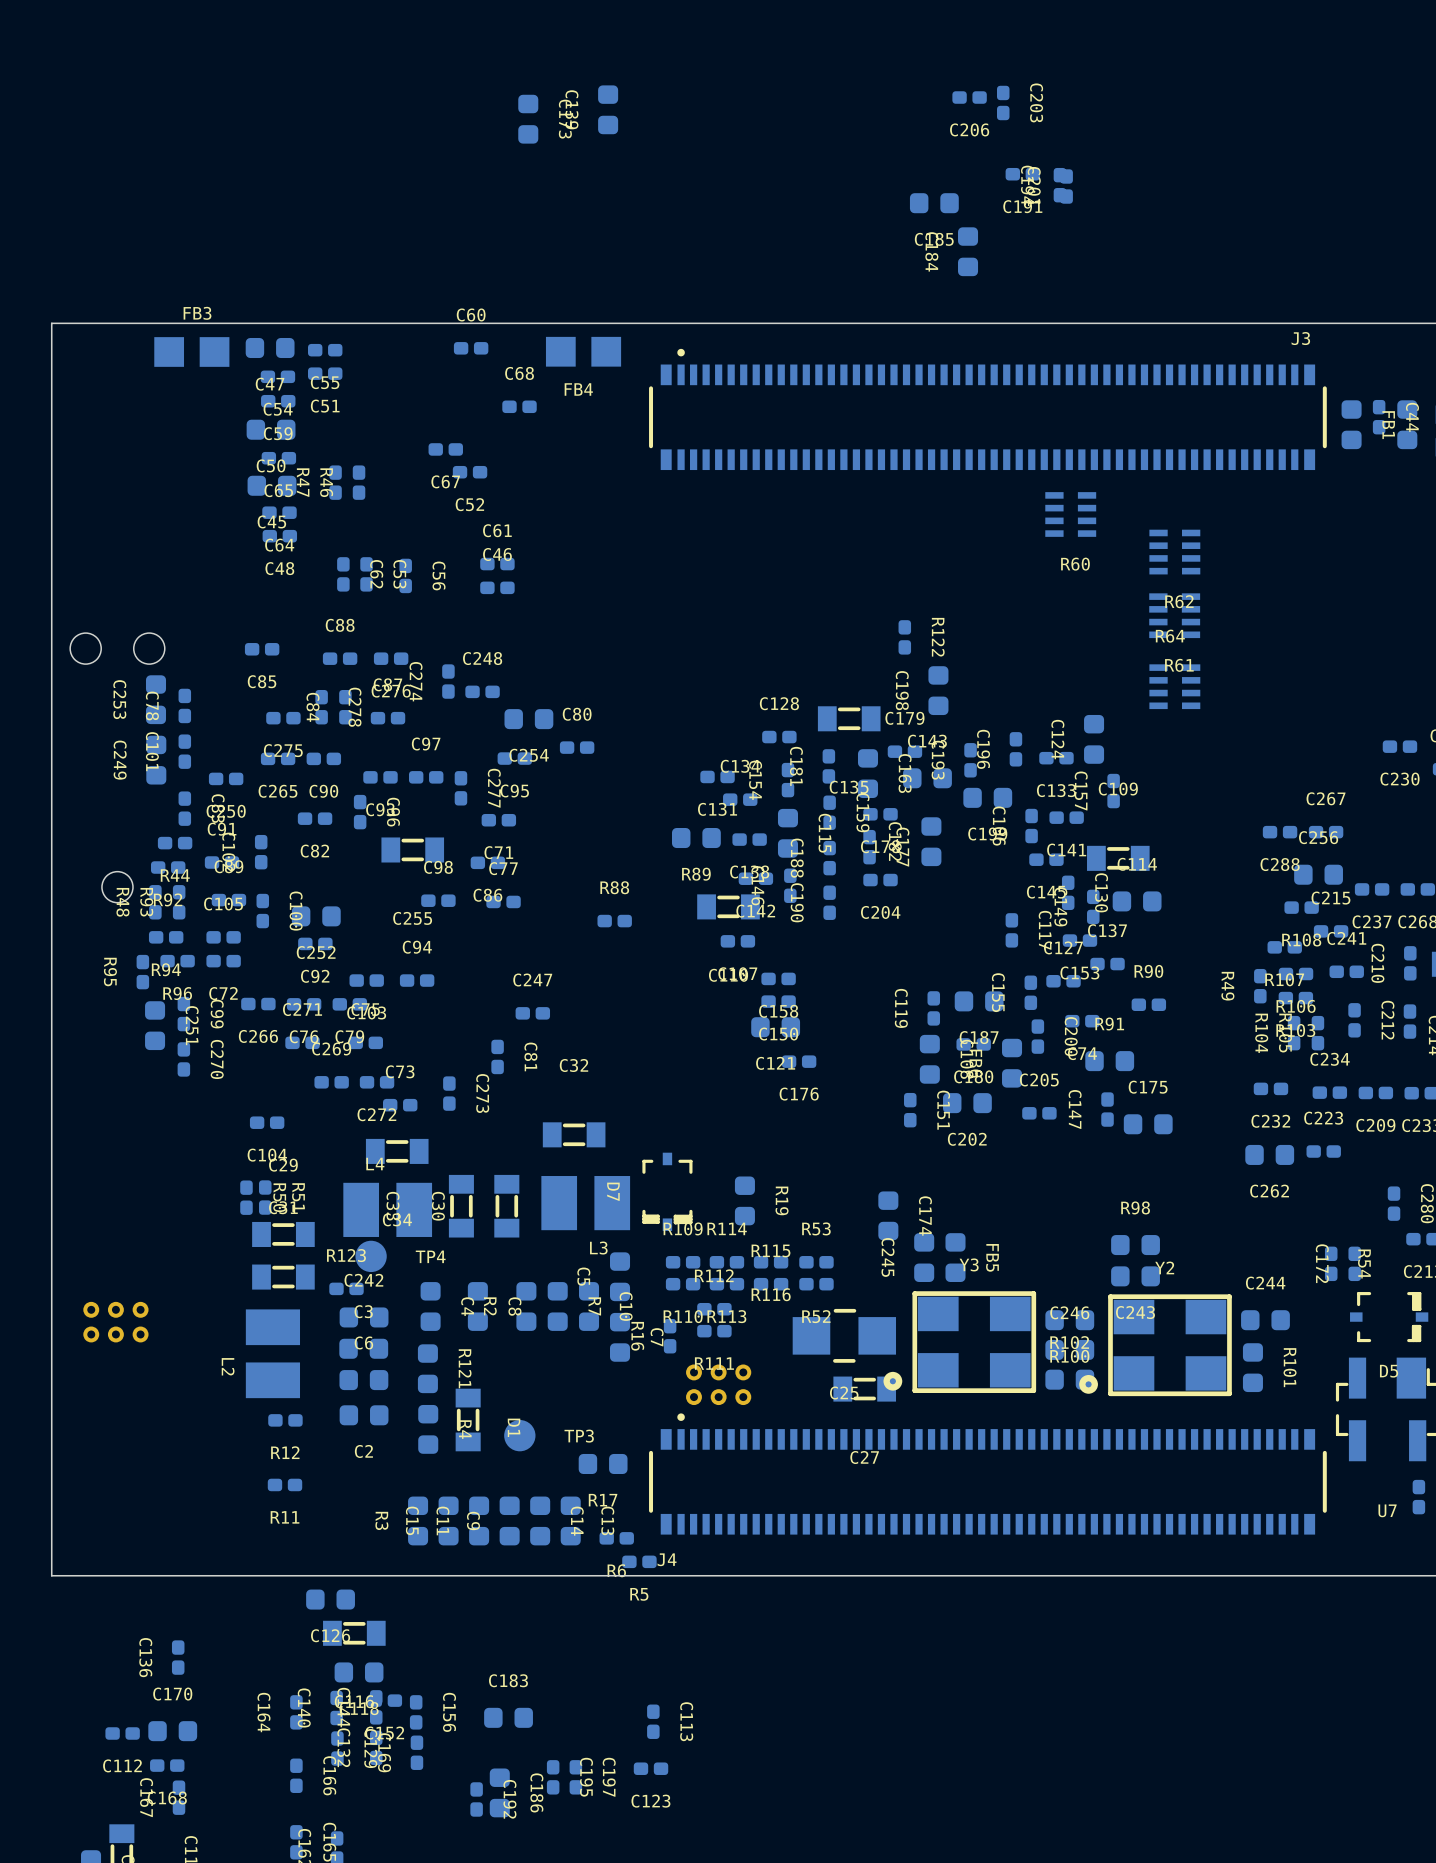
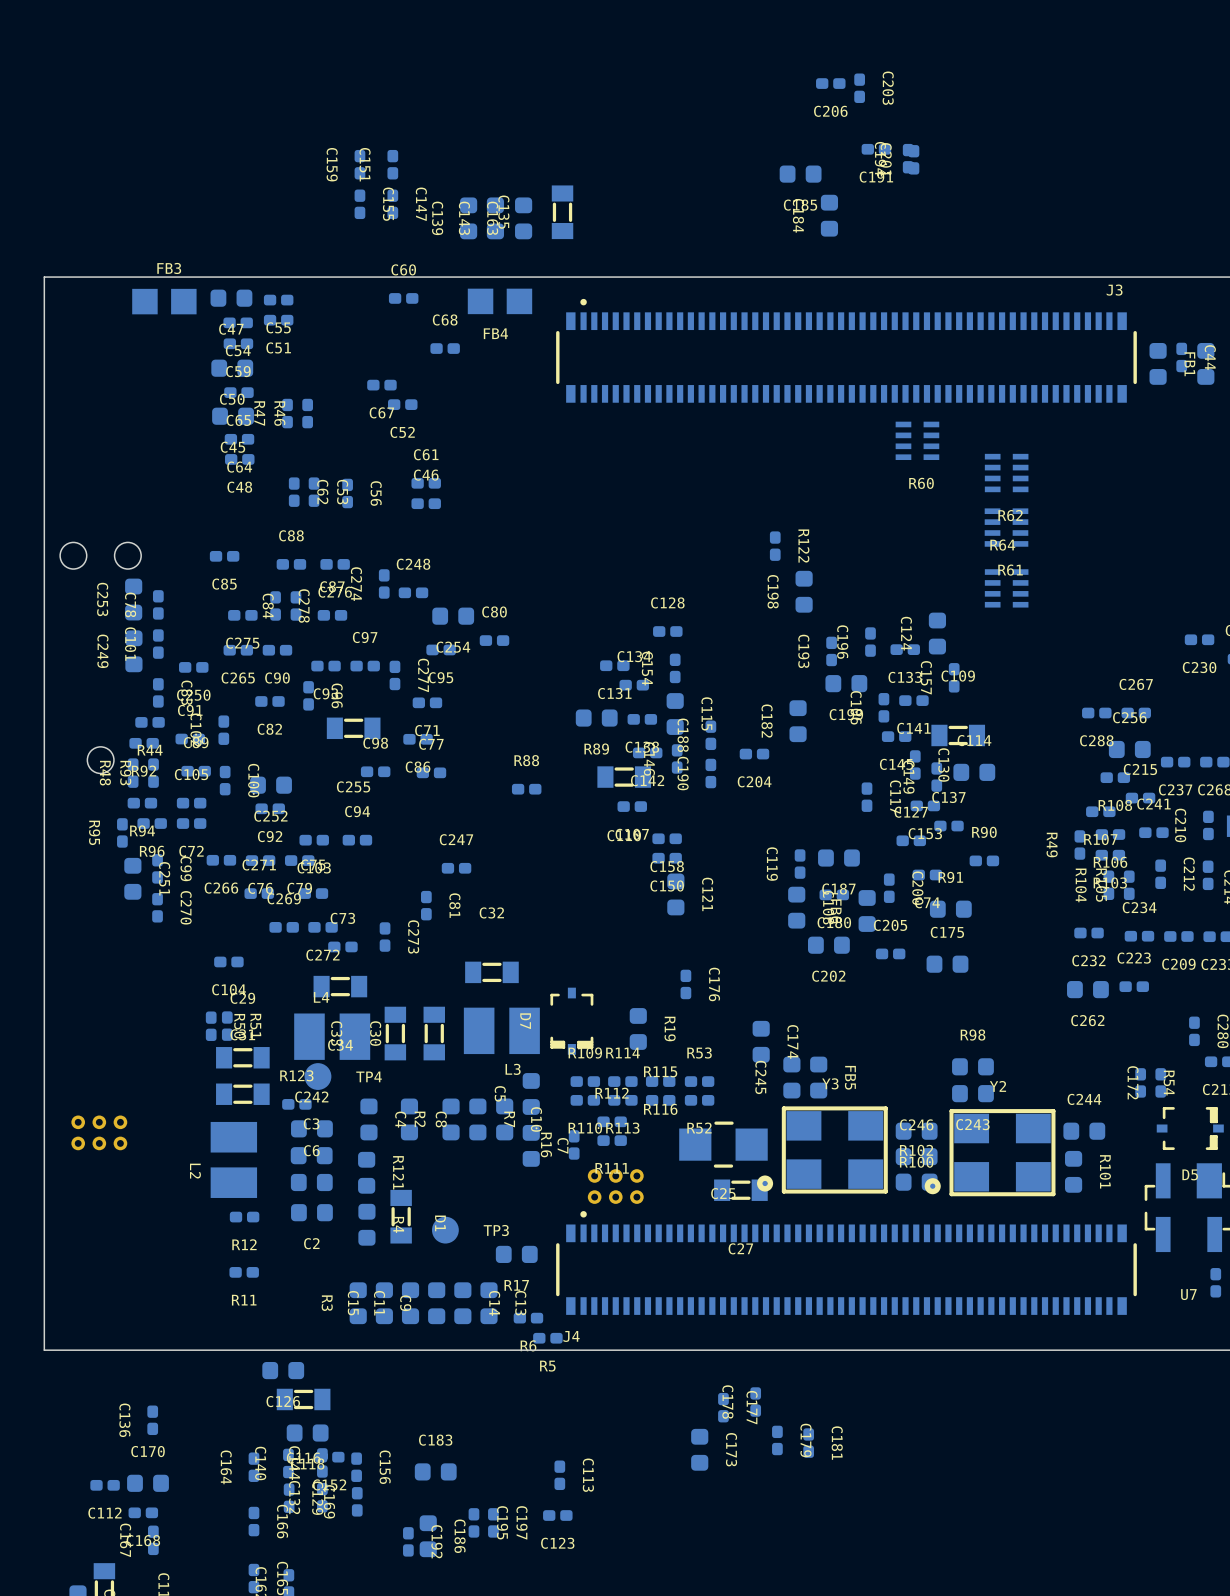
C139 position: (608, 109) -> (468, 218)
C173 position: (528, 119) -> (699, 1449)
C135 rotation: 0° (849, 718) -> 90° clockwise (562, 212)
C135 position: (849, 718) -> (562, 212)
C179 rotation: 0° (904, 751) -> 90° clockwise (777, 1440)
C179 position: (904, 751) -> (777, 1440)
C181 name position: C181 (796, 766) -> C181 (837, 1443)
C181 position: (828, 766) -> (808, 1443)
C163 position: (868, 773) -> (523, 218)
C163 name position: C163 (905, 773) -> C163 (492, 218)
C143 rotation: 0° (927, 778) -> 90° clockwise (495, 218)
C143 position: (927, 778) -> (495, 218)
C159 position: (829, 812) -> (359, 164)
C159 name position: C159 (862, 812) -> C159 (332, 164)
C178 rotation: 0° (880, 814) -> 90° clockwise (755, 1402)
C178 position: (880, 814) -> (755, 1402)
C177 position: (869, 847) -> (723, 1407)
C155 name position: C155 (998, 992) -> C155 (388, 204)
C155 position: (1030, 992) -> (359, 204)
C121 rotation: 0° (775, 1027) -> 90° clockwise (675, 894)
C176 rotation: 0° (799, 1061) -> 90° clockwise (685, 984)
C176 position: (799, 1061) -> (685, 984)
C147 name position: C147 (1075, 1109) -> C147 (421, 204)
C147 position: (1107, 1109) -> (392, 204)
C151 position: (910, 1110) -> (392, 164)
C151 name position: C151 (943, 1110) -> C151 (365, 164)
C175 position: (1148, 1124) -> (947, 964)

